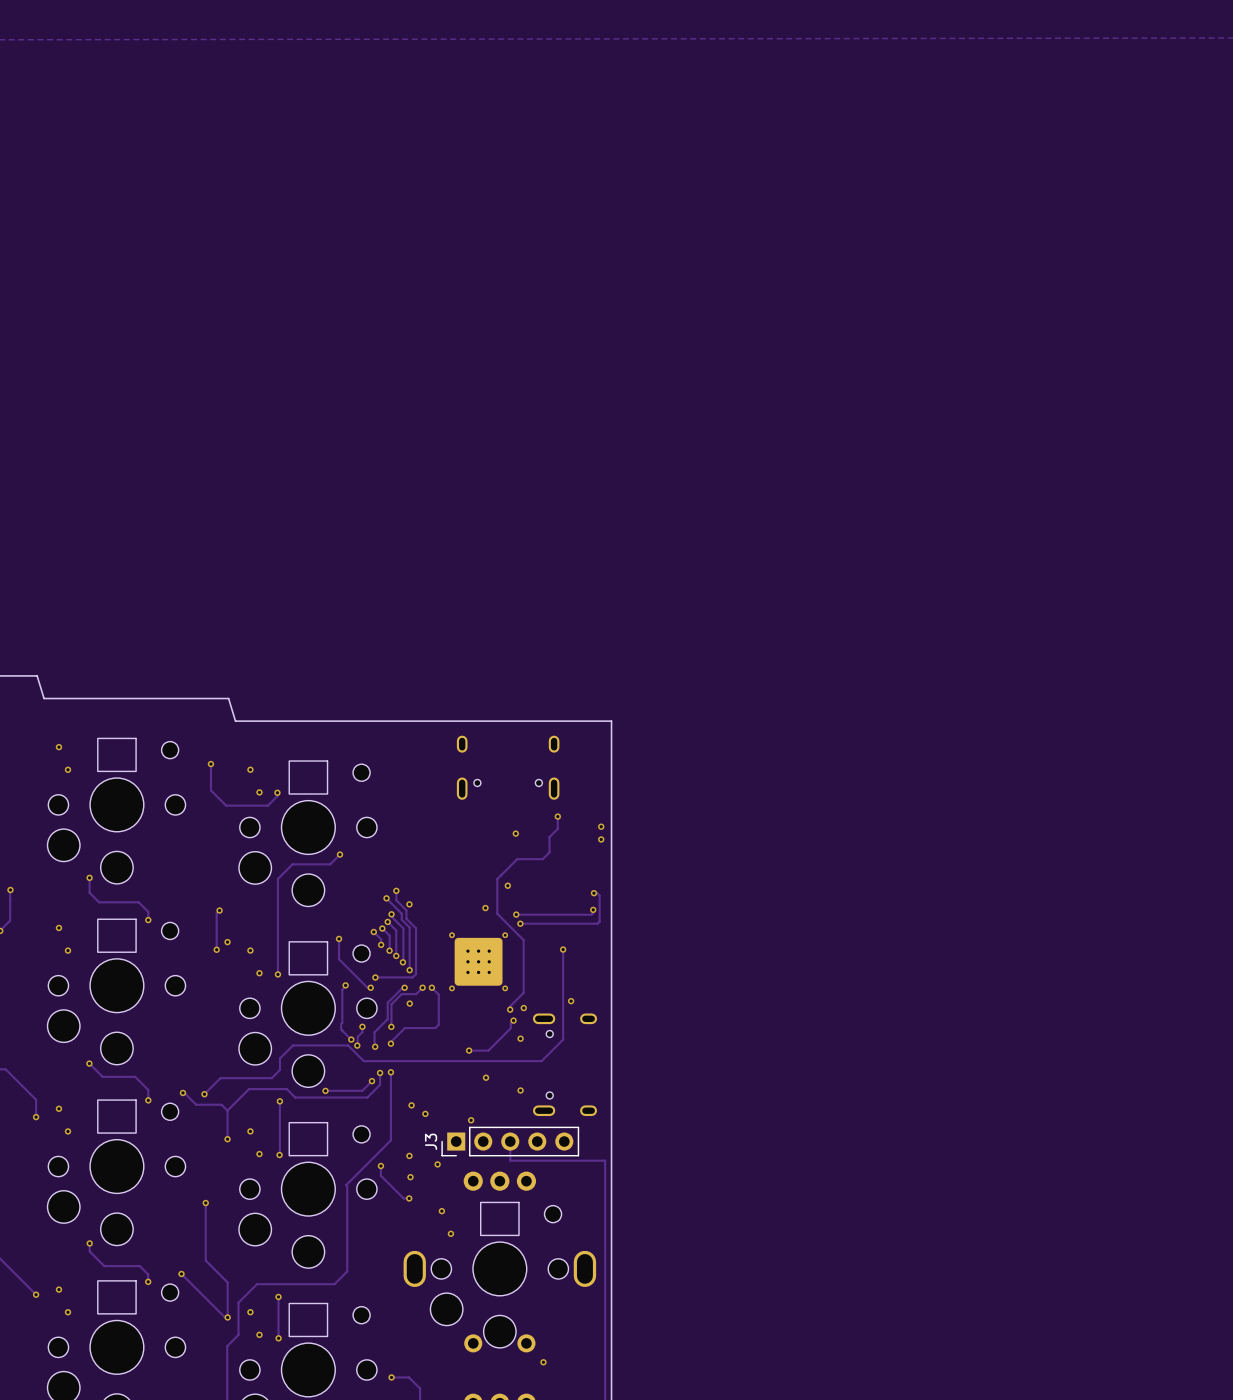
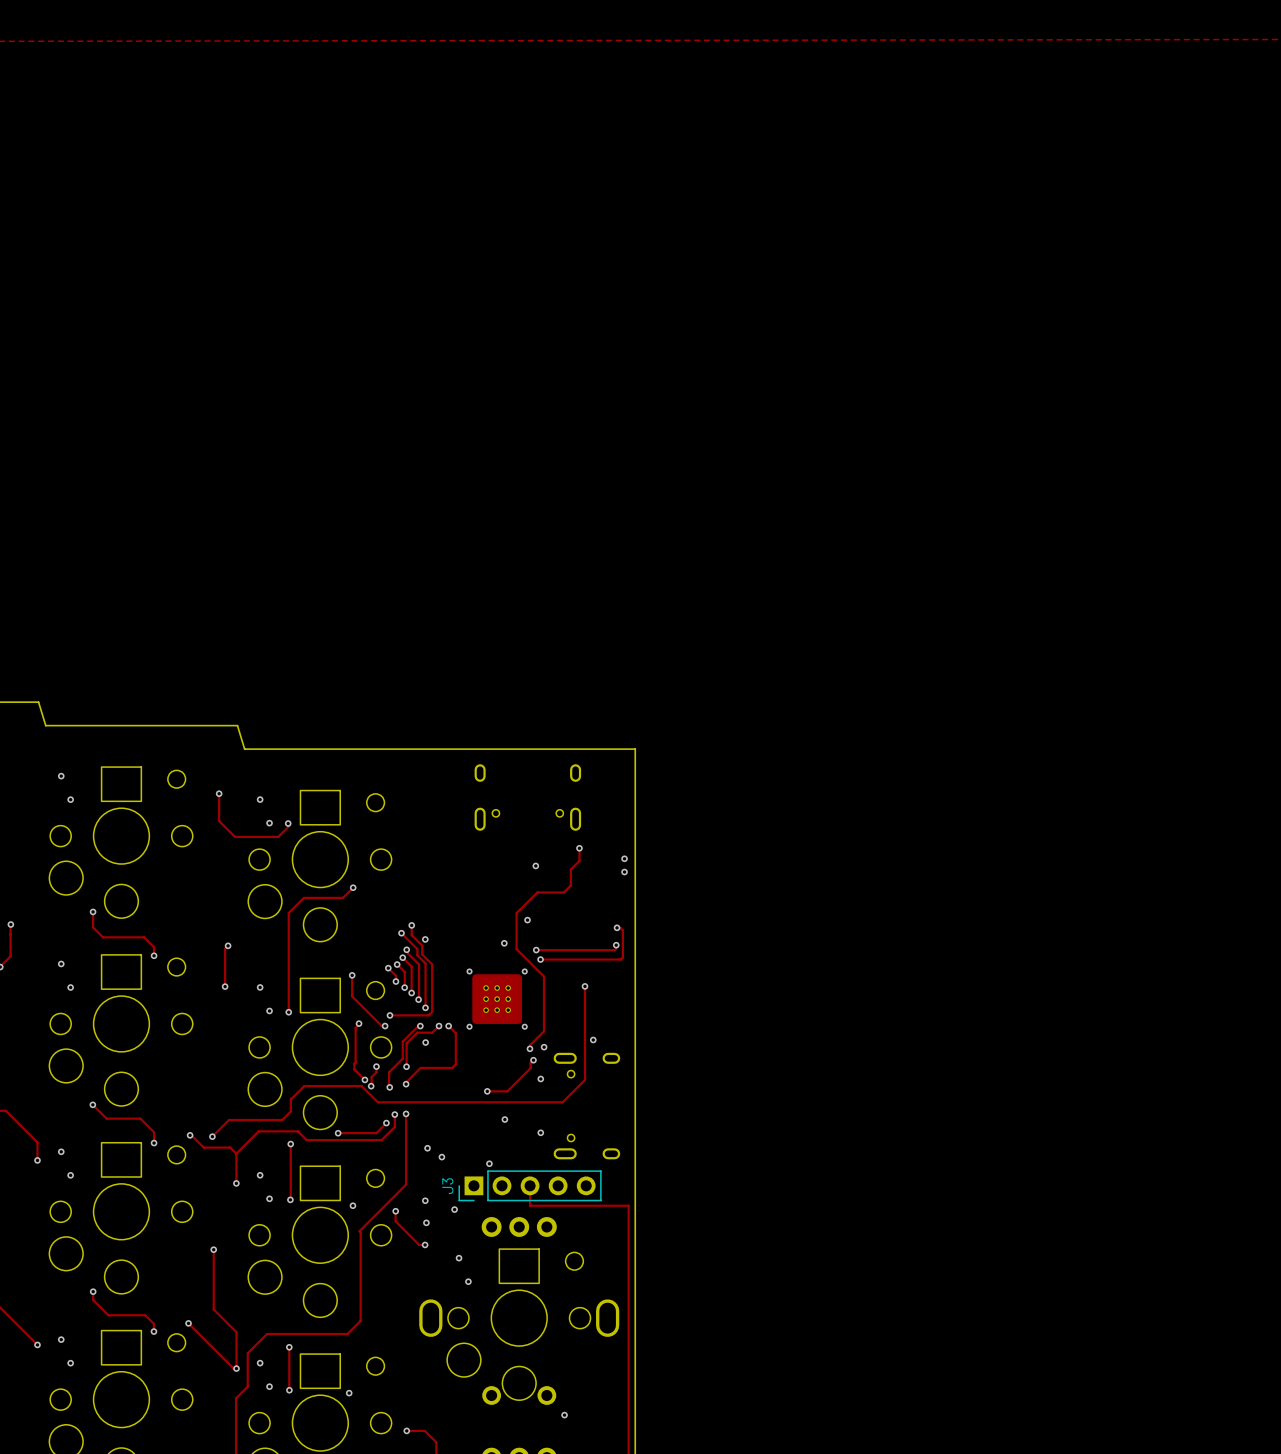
via: (227, 942) -> none
via: none -> (352, 1205)
via: none -> (349, 1393)

